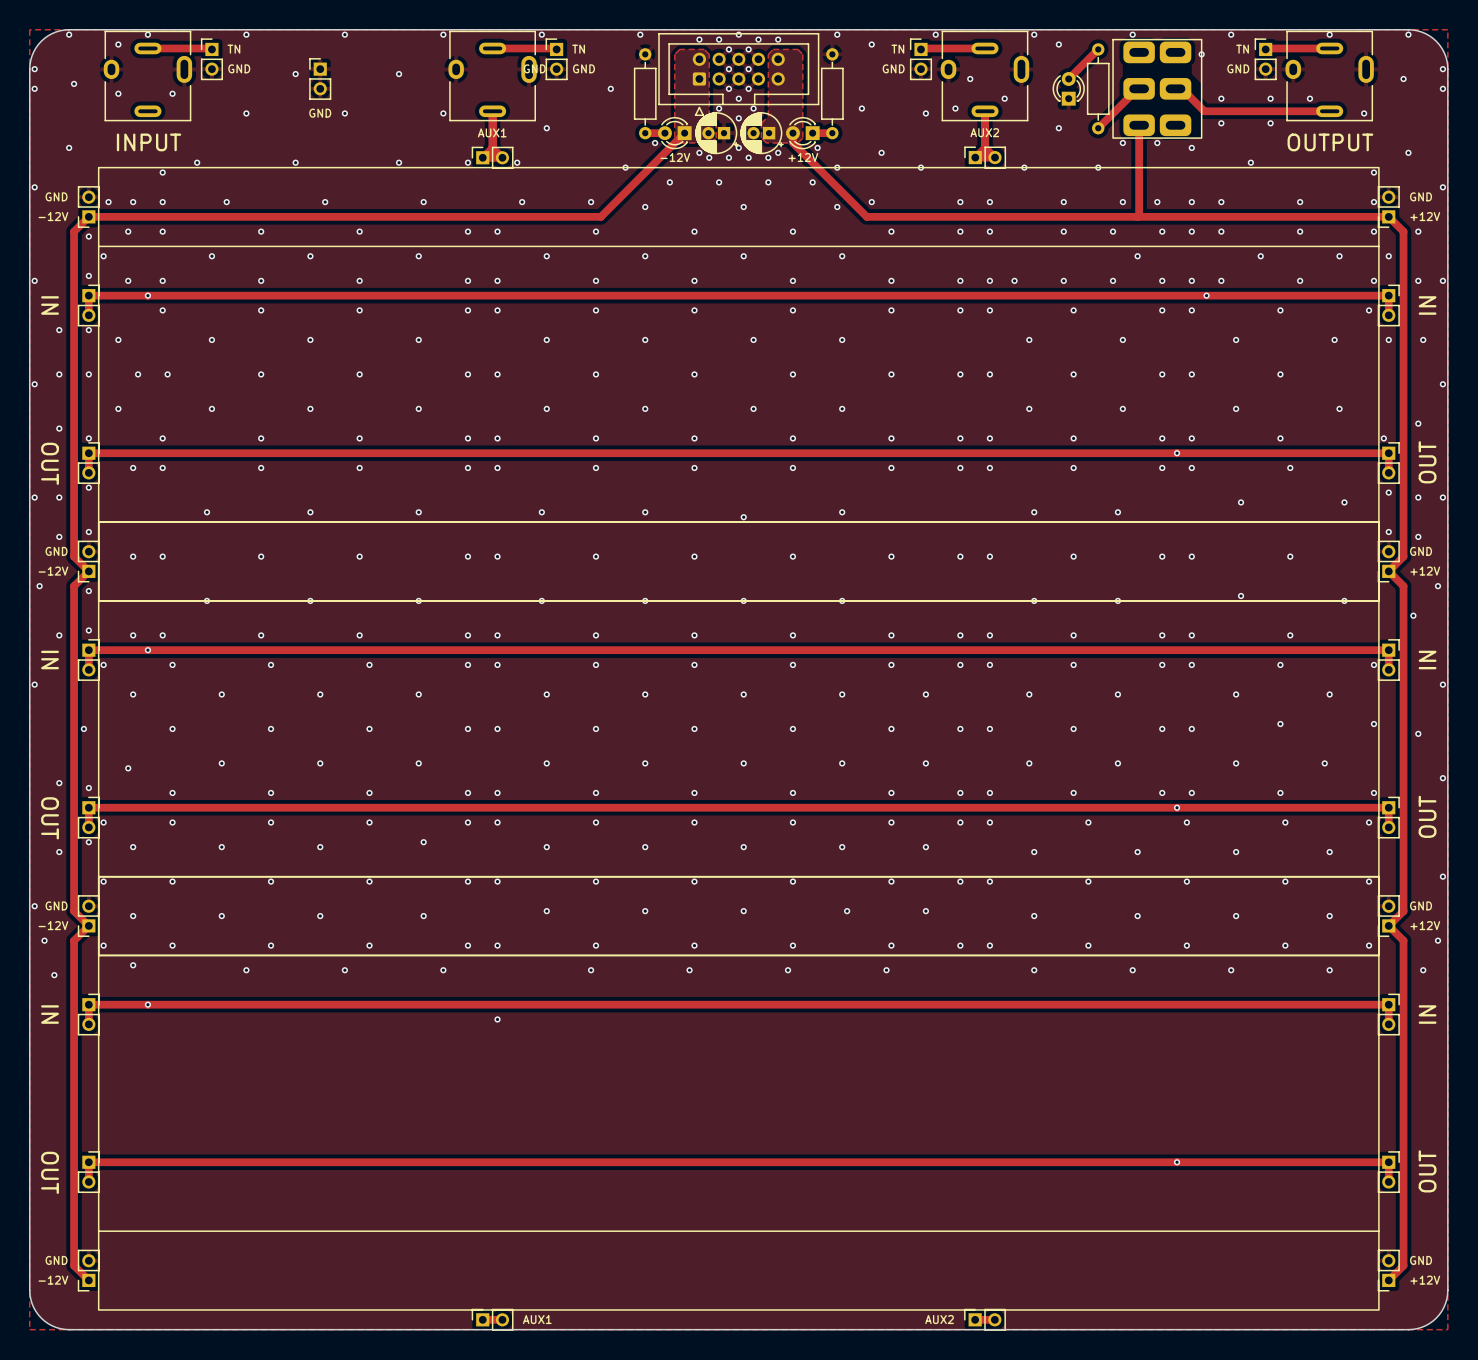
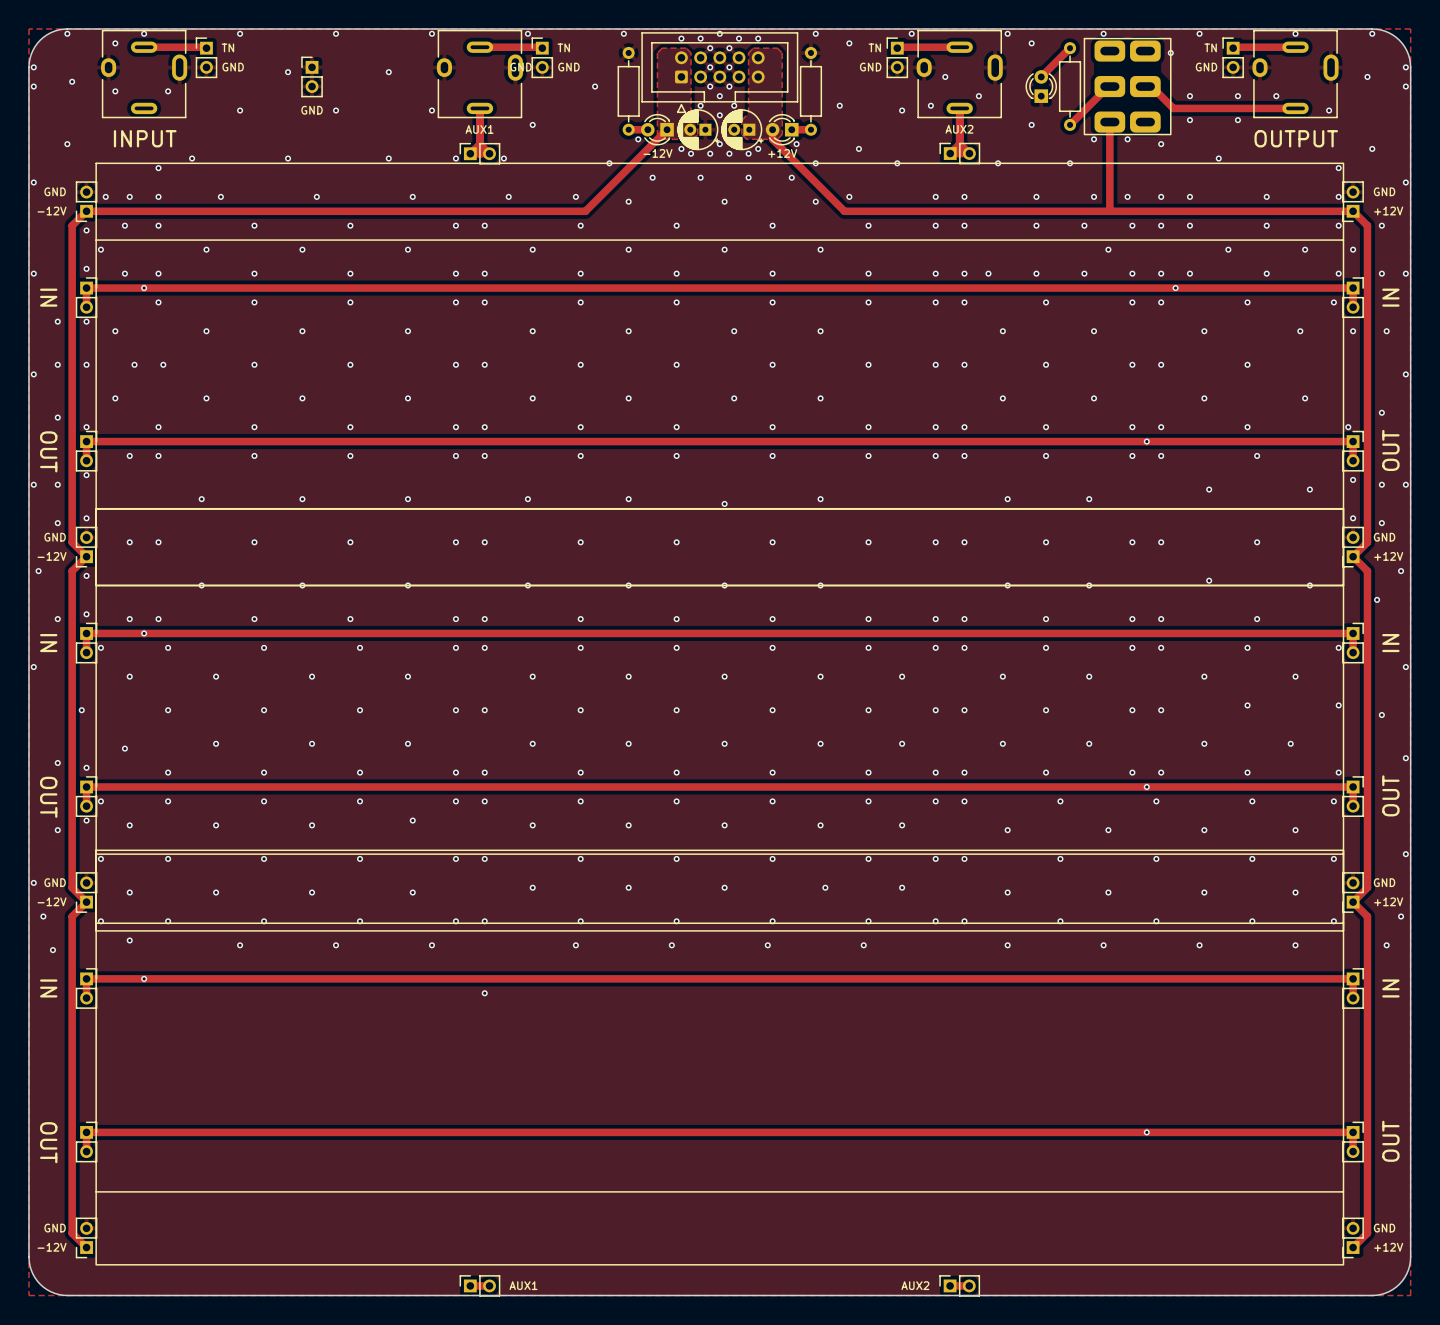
drawing: none -> [95, 849, 1344, 1266]
drawing: [98, 876, 1380, 1311] -> none

